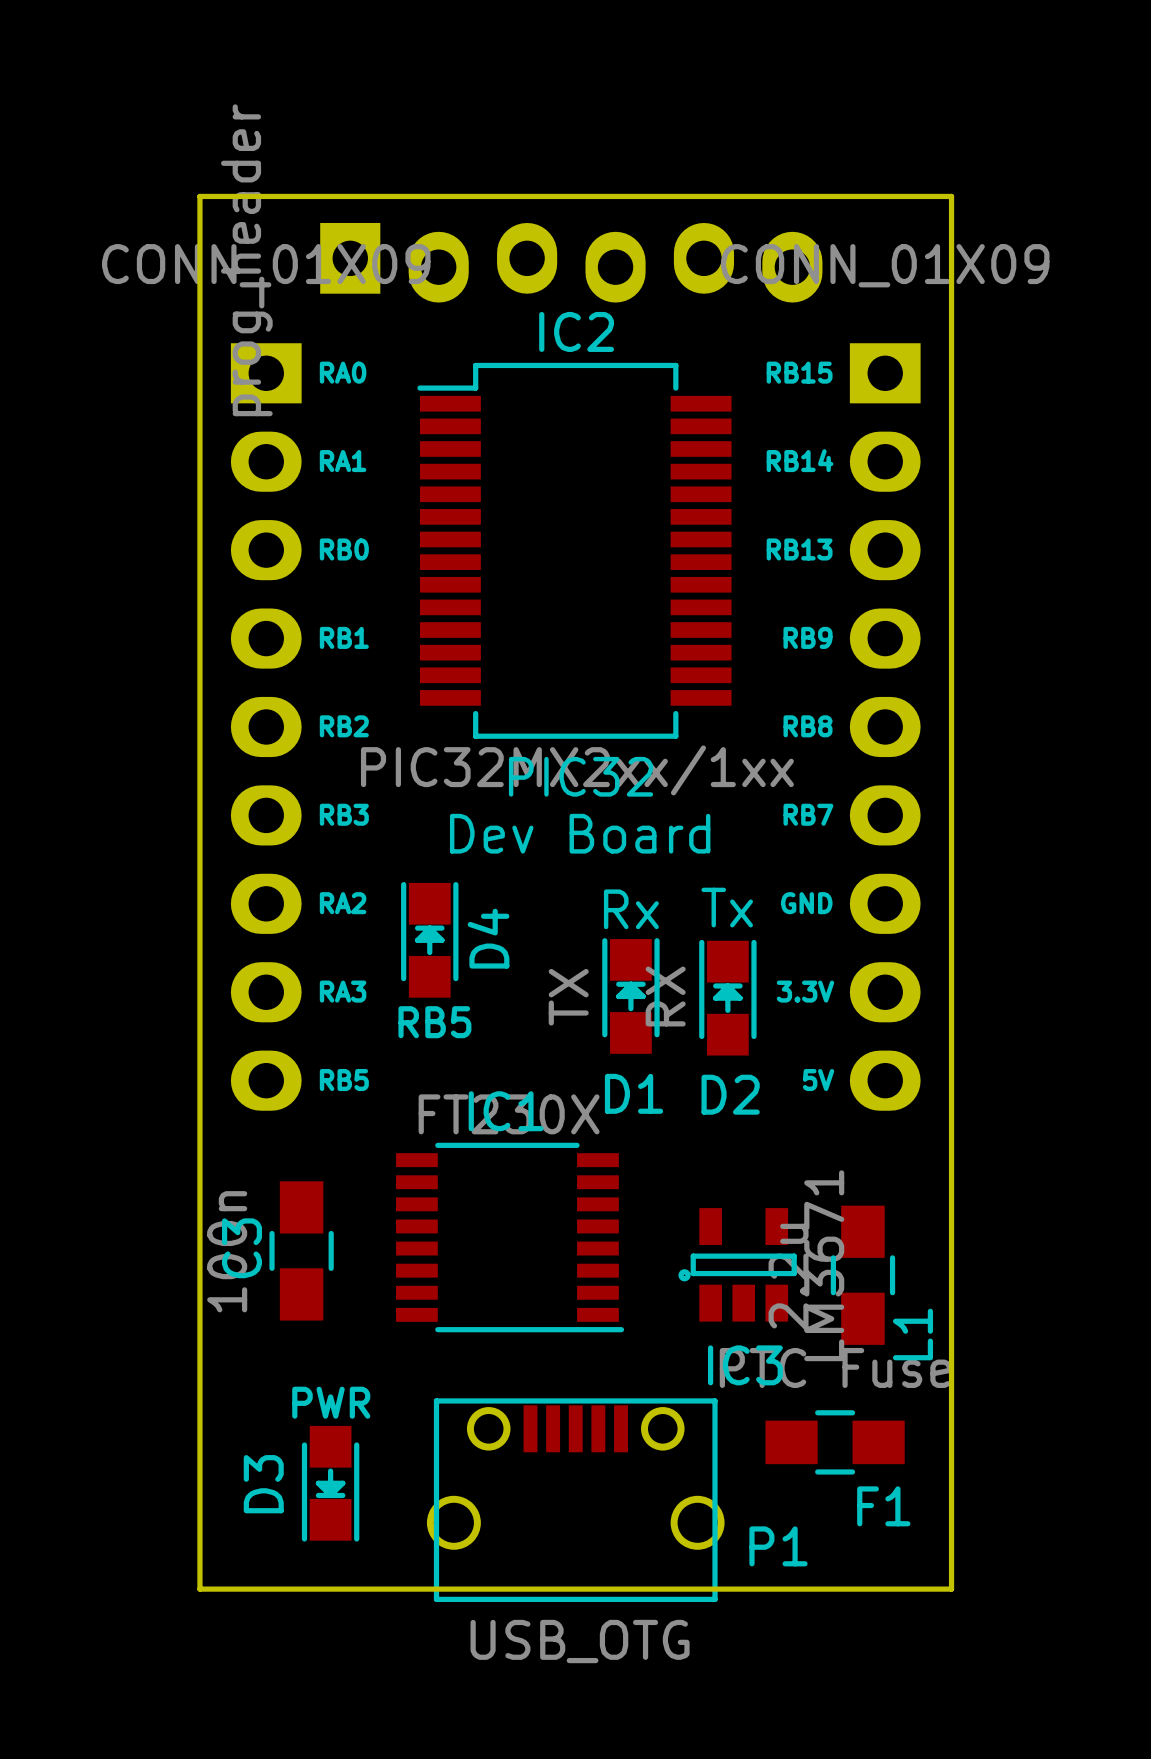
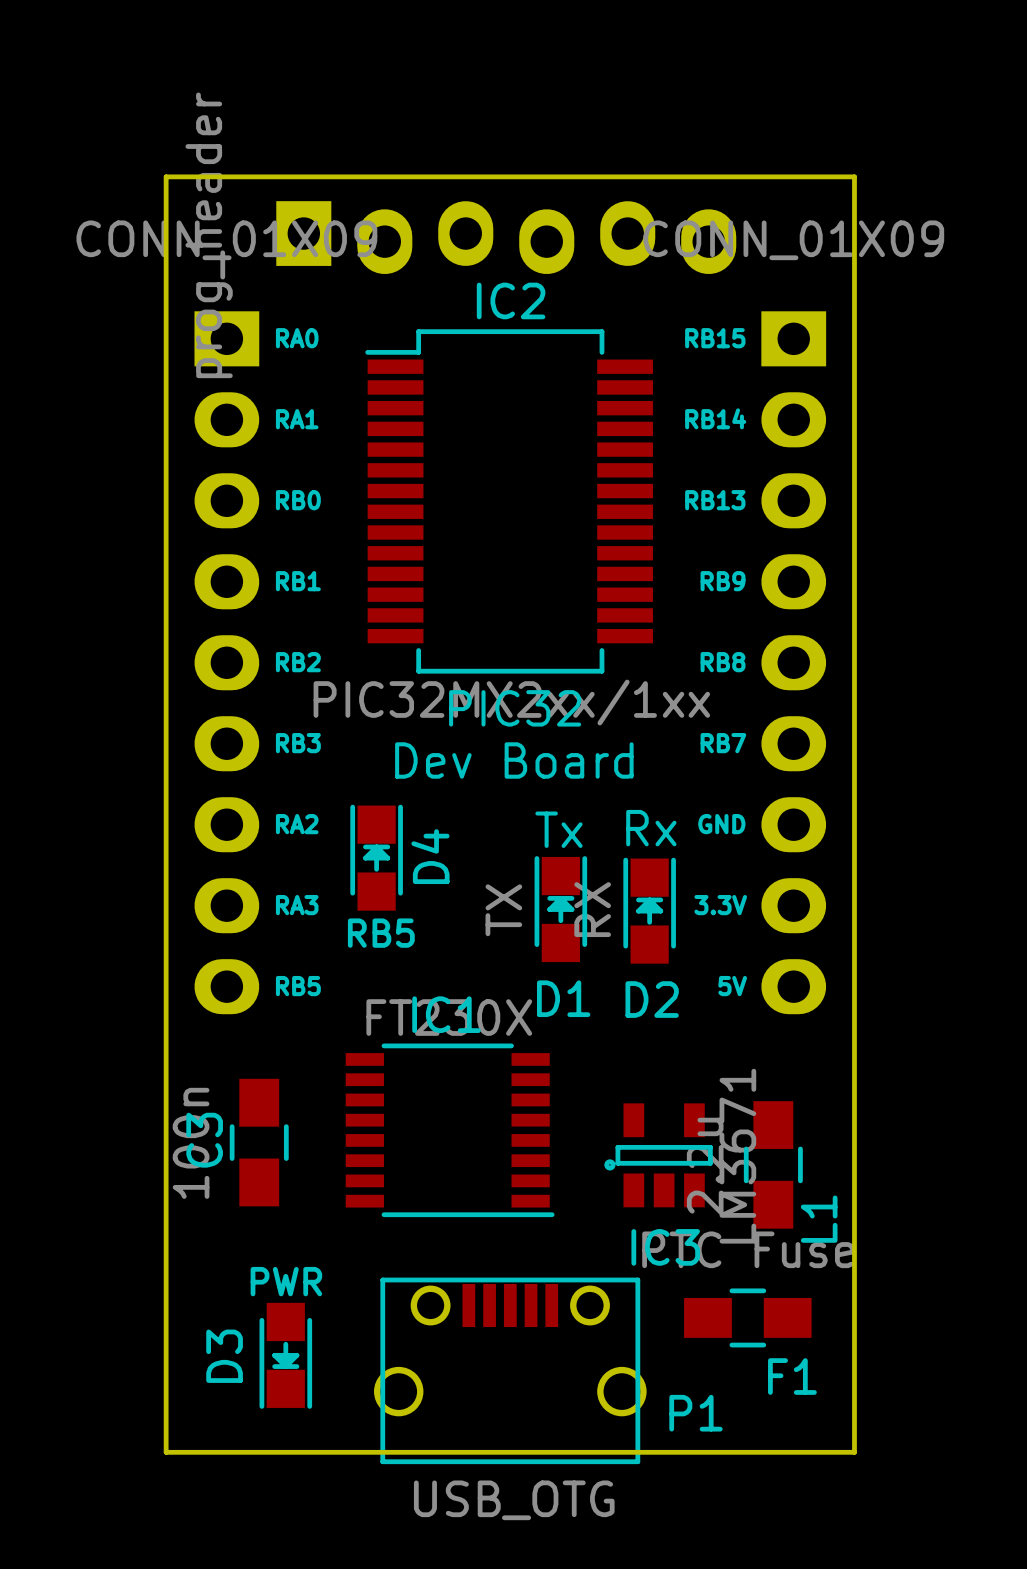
text: Tx (727, 907) -> Rx (651, 828)
text: Rx (631, 909) -> Tx (558, 829)

